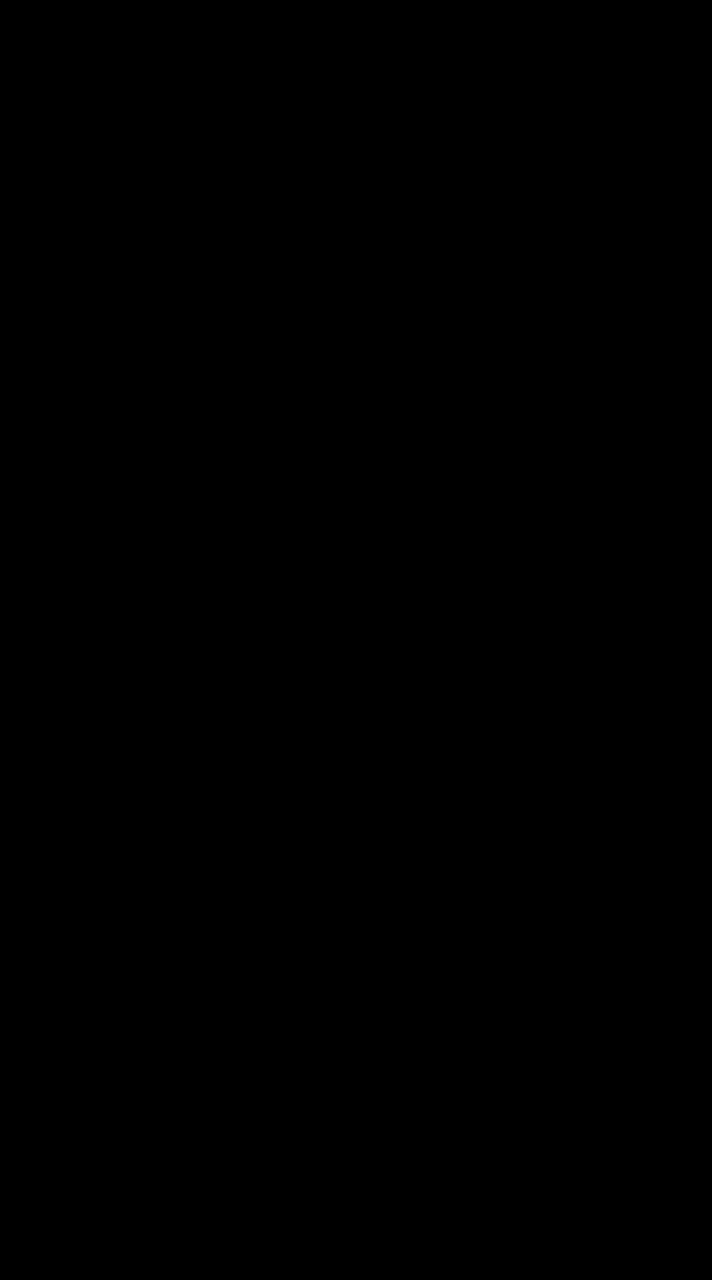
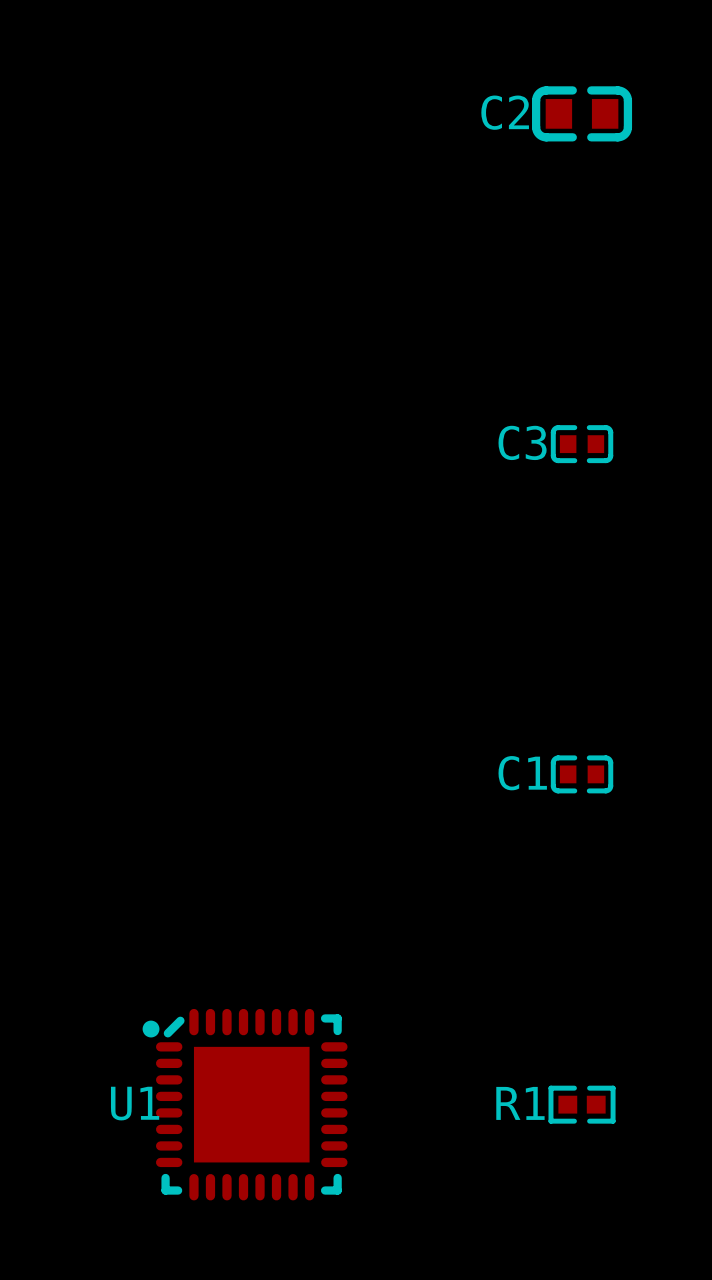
C2: none -> (582, 113)
C3: none -> (582, 444)
C1: none -> (582, 774)
U1: none -> (245, 1104)
R1: none -> (582, 1104)

